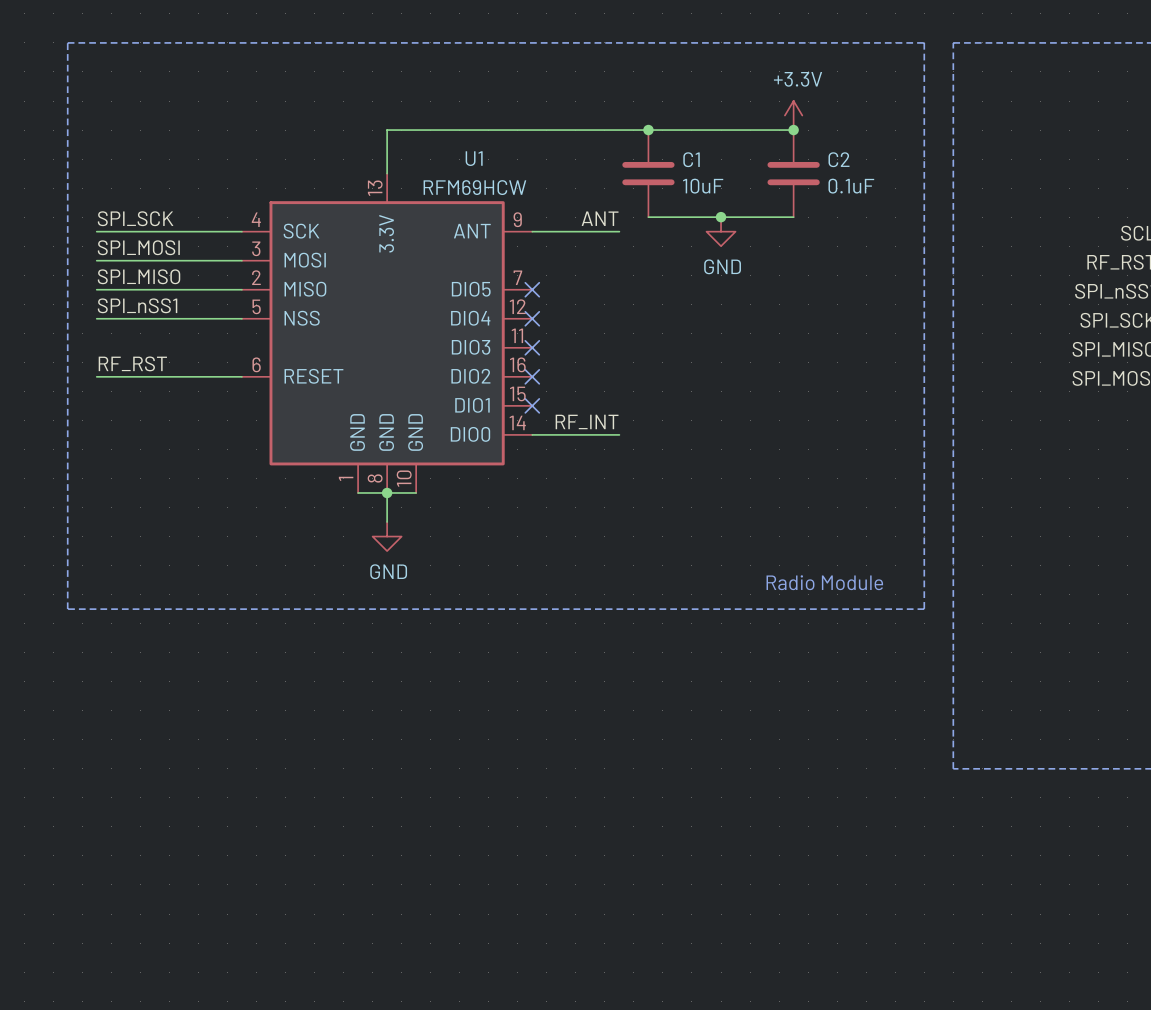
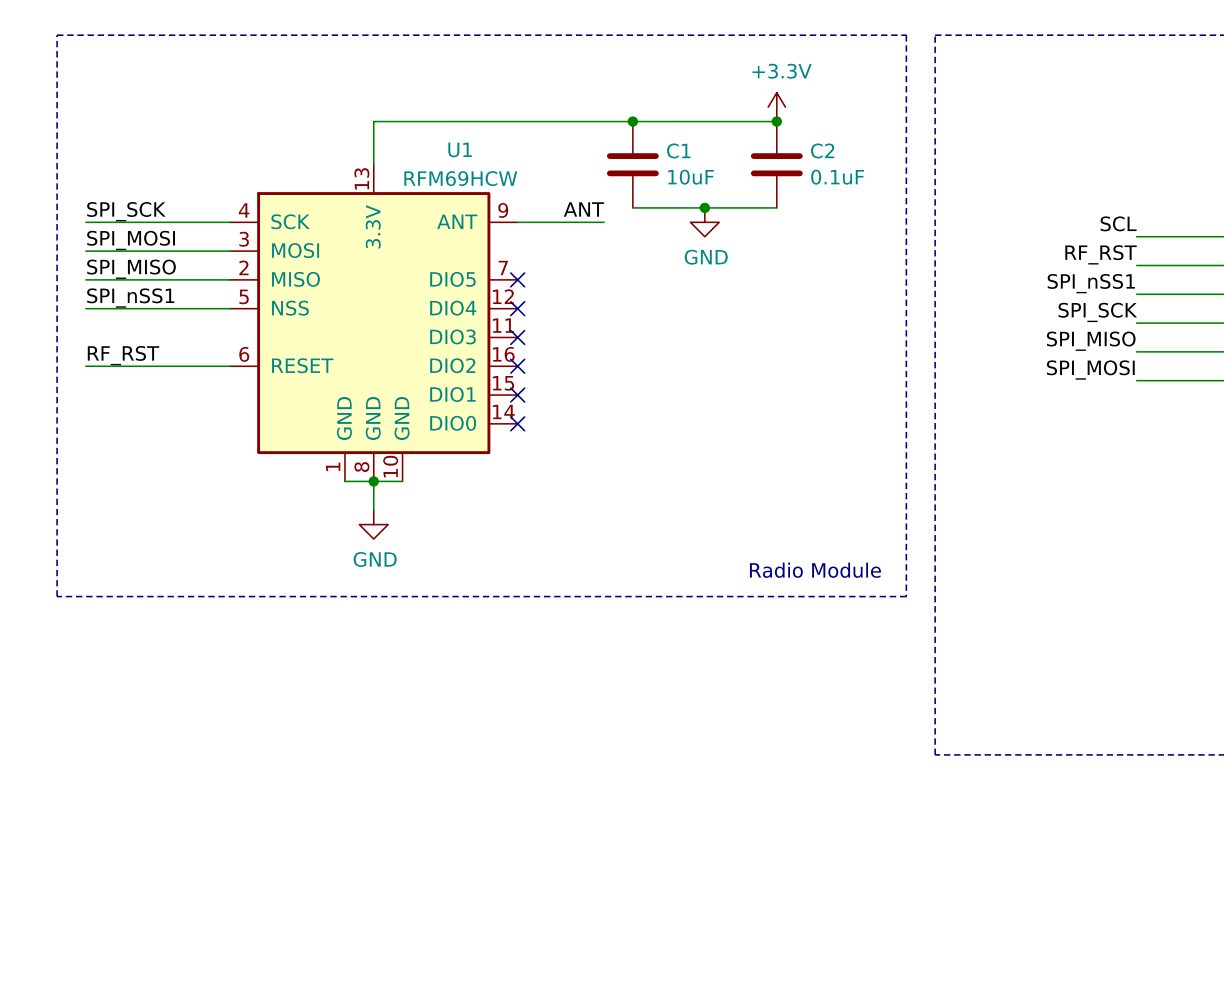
label: RF_INT (587, 421) -> none
wire: (532, 434) (619, 434) -> none
no-connect mark: none -> (517, 423)

